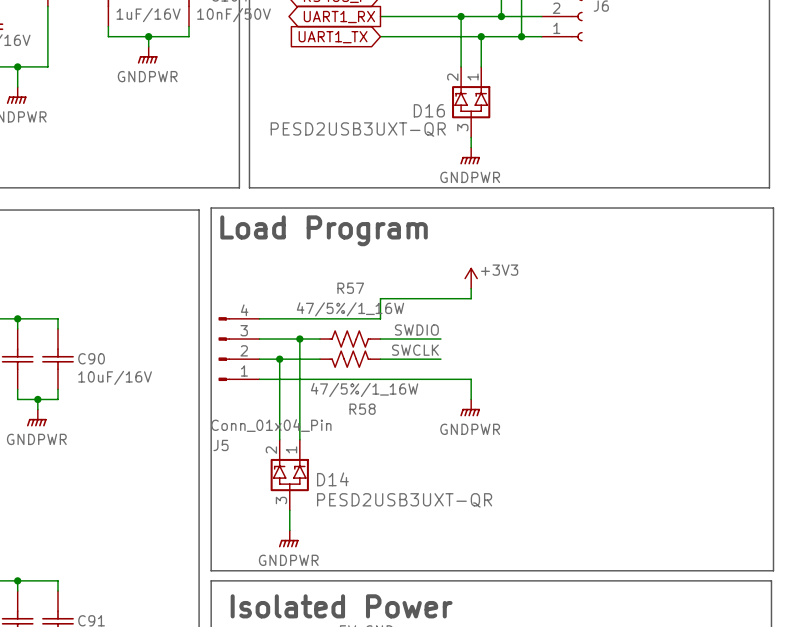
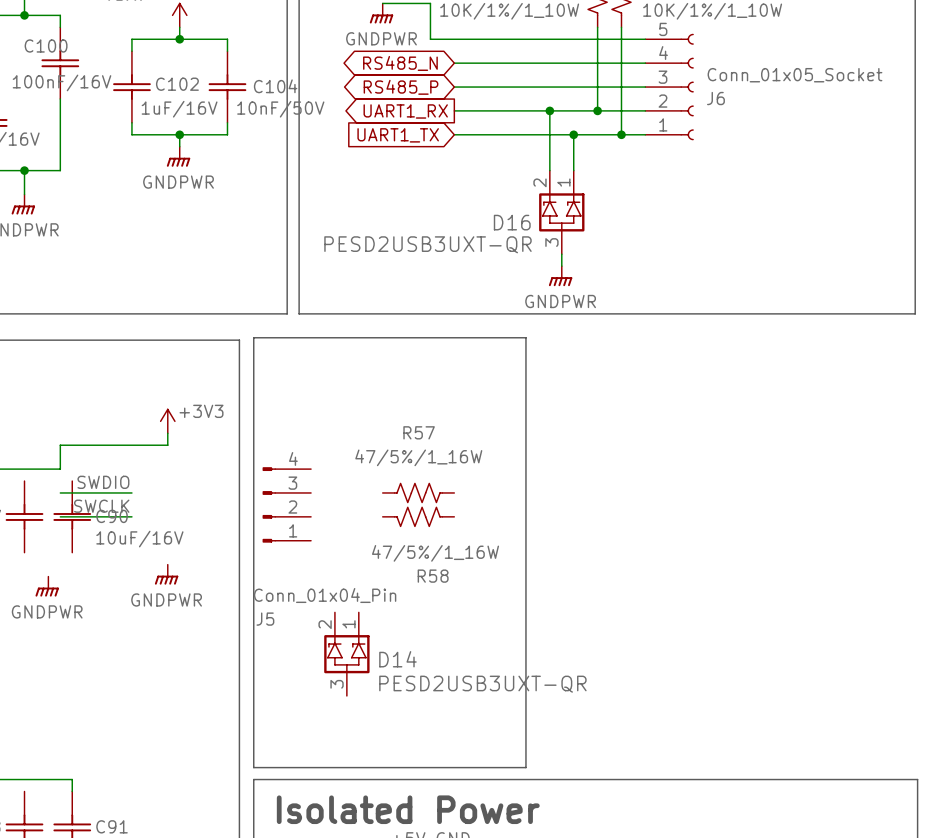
line: (440, 208) (773, 208) (773, 570) (440, 570) -> (525, 337) (525, 767)
text: Load Program (324, 230) -> none
power symbol: none -> +3V3 (167, 421)
power symbol: +3V3 (471, 278) -> none
wire: (471, 288) (471, 298) (380, 298) (380, 318) (259, 318) -> none
wire: (17, 318) (17, 328) -> none
junction: (17, 318) -> none
wire: (47, 318) (57, 318) (57, 328) -> (60, 469) (60, 445) (167, 445) (167, 433)
label: none -> SWDIO (103, 482)
label: SWDIO (416, 330) -> none
wire: none -> (60, 492) (131, 492)
wire: (259, 339) (320, 339) -> none
wire: (299, 339) (299, 439) -> none
junction: (299, 339) -> none
wire: (380, 339) (440, 339) -> none
label: none -> SWCLK (101, 506)
label: SWCLK (415, 350) -> none
wire: none -> (60, 516) (131, 516)
wire: (259, 359) (320, 359) -> none
wire: (279, 359) (279, 439) -> none
junction: (279, 359) -> none
wire: (380, 359) (440, 359) -> none
wire: (259, 379) (471, 379) (471, 399) -> none
wire: (17, 389) (17, 399) (57, 399) (57, 389) -> none
wire: (37, 399) (37, 409) -> none
junction: (37, 399) -> none
power symbol: none -> GNDPWR (166, 574)
power symbol: GNDPWR (470, 407) -> none
wire: (289, 510) (289, 530) -> none
power symbol: GNDPWR (288, 538) -> none
wire: (17, 580) (17, 590) -> none
junction: (17, 580) -> none

